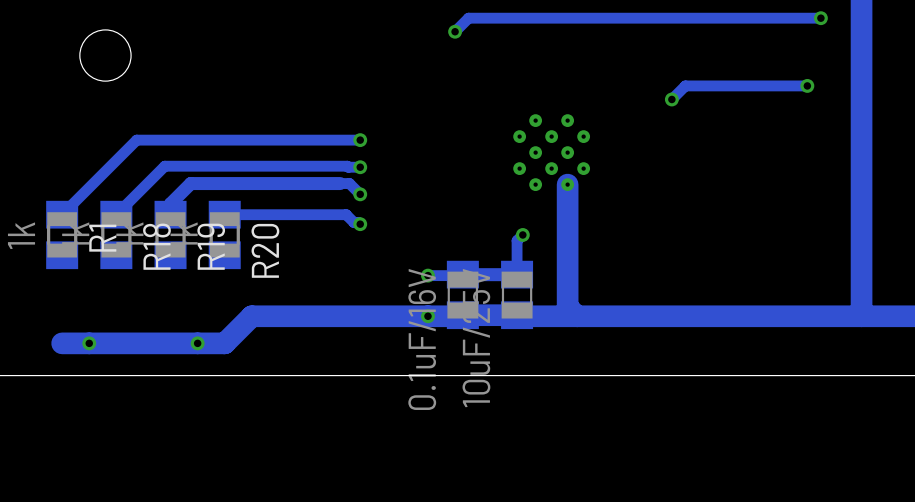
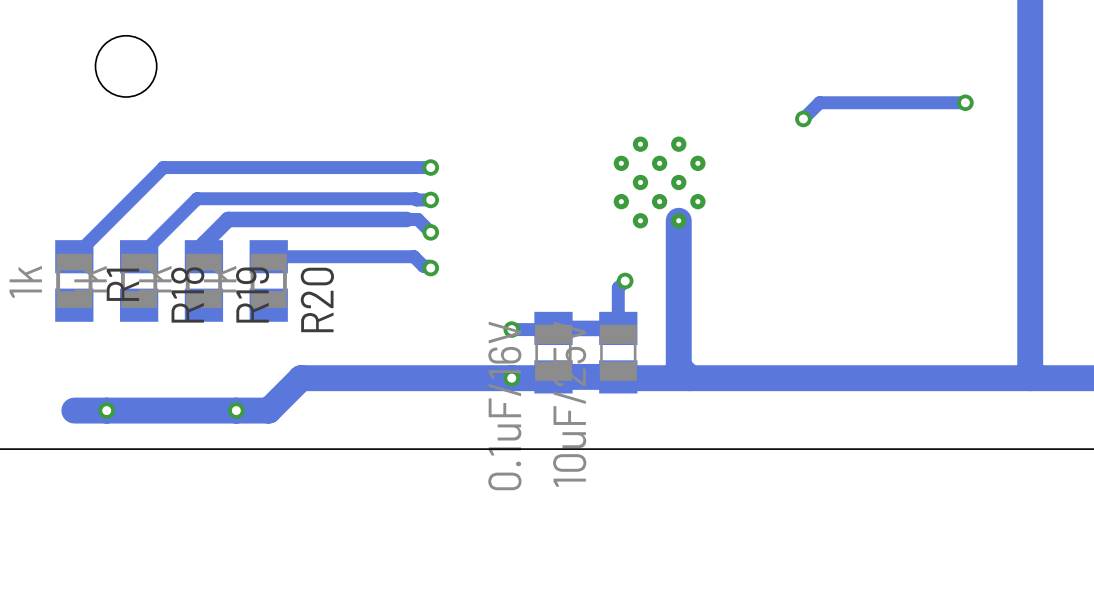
track: (820, 18) (468, 18) (455, 31) -> none
via: (820, 18) -> none
via: (455, 31) -> none

